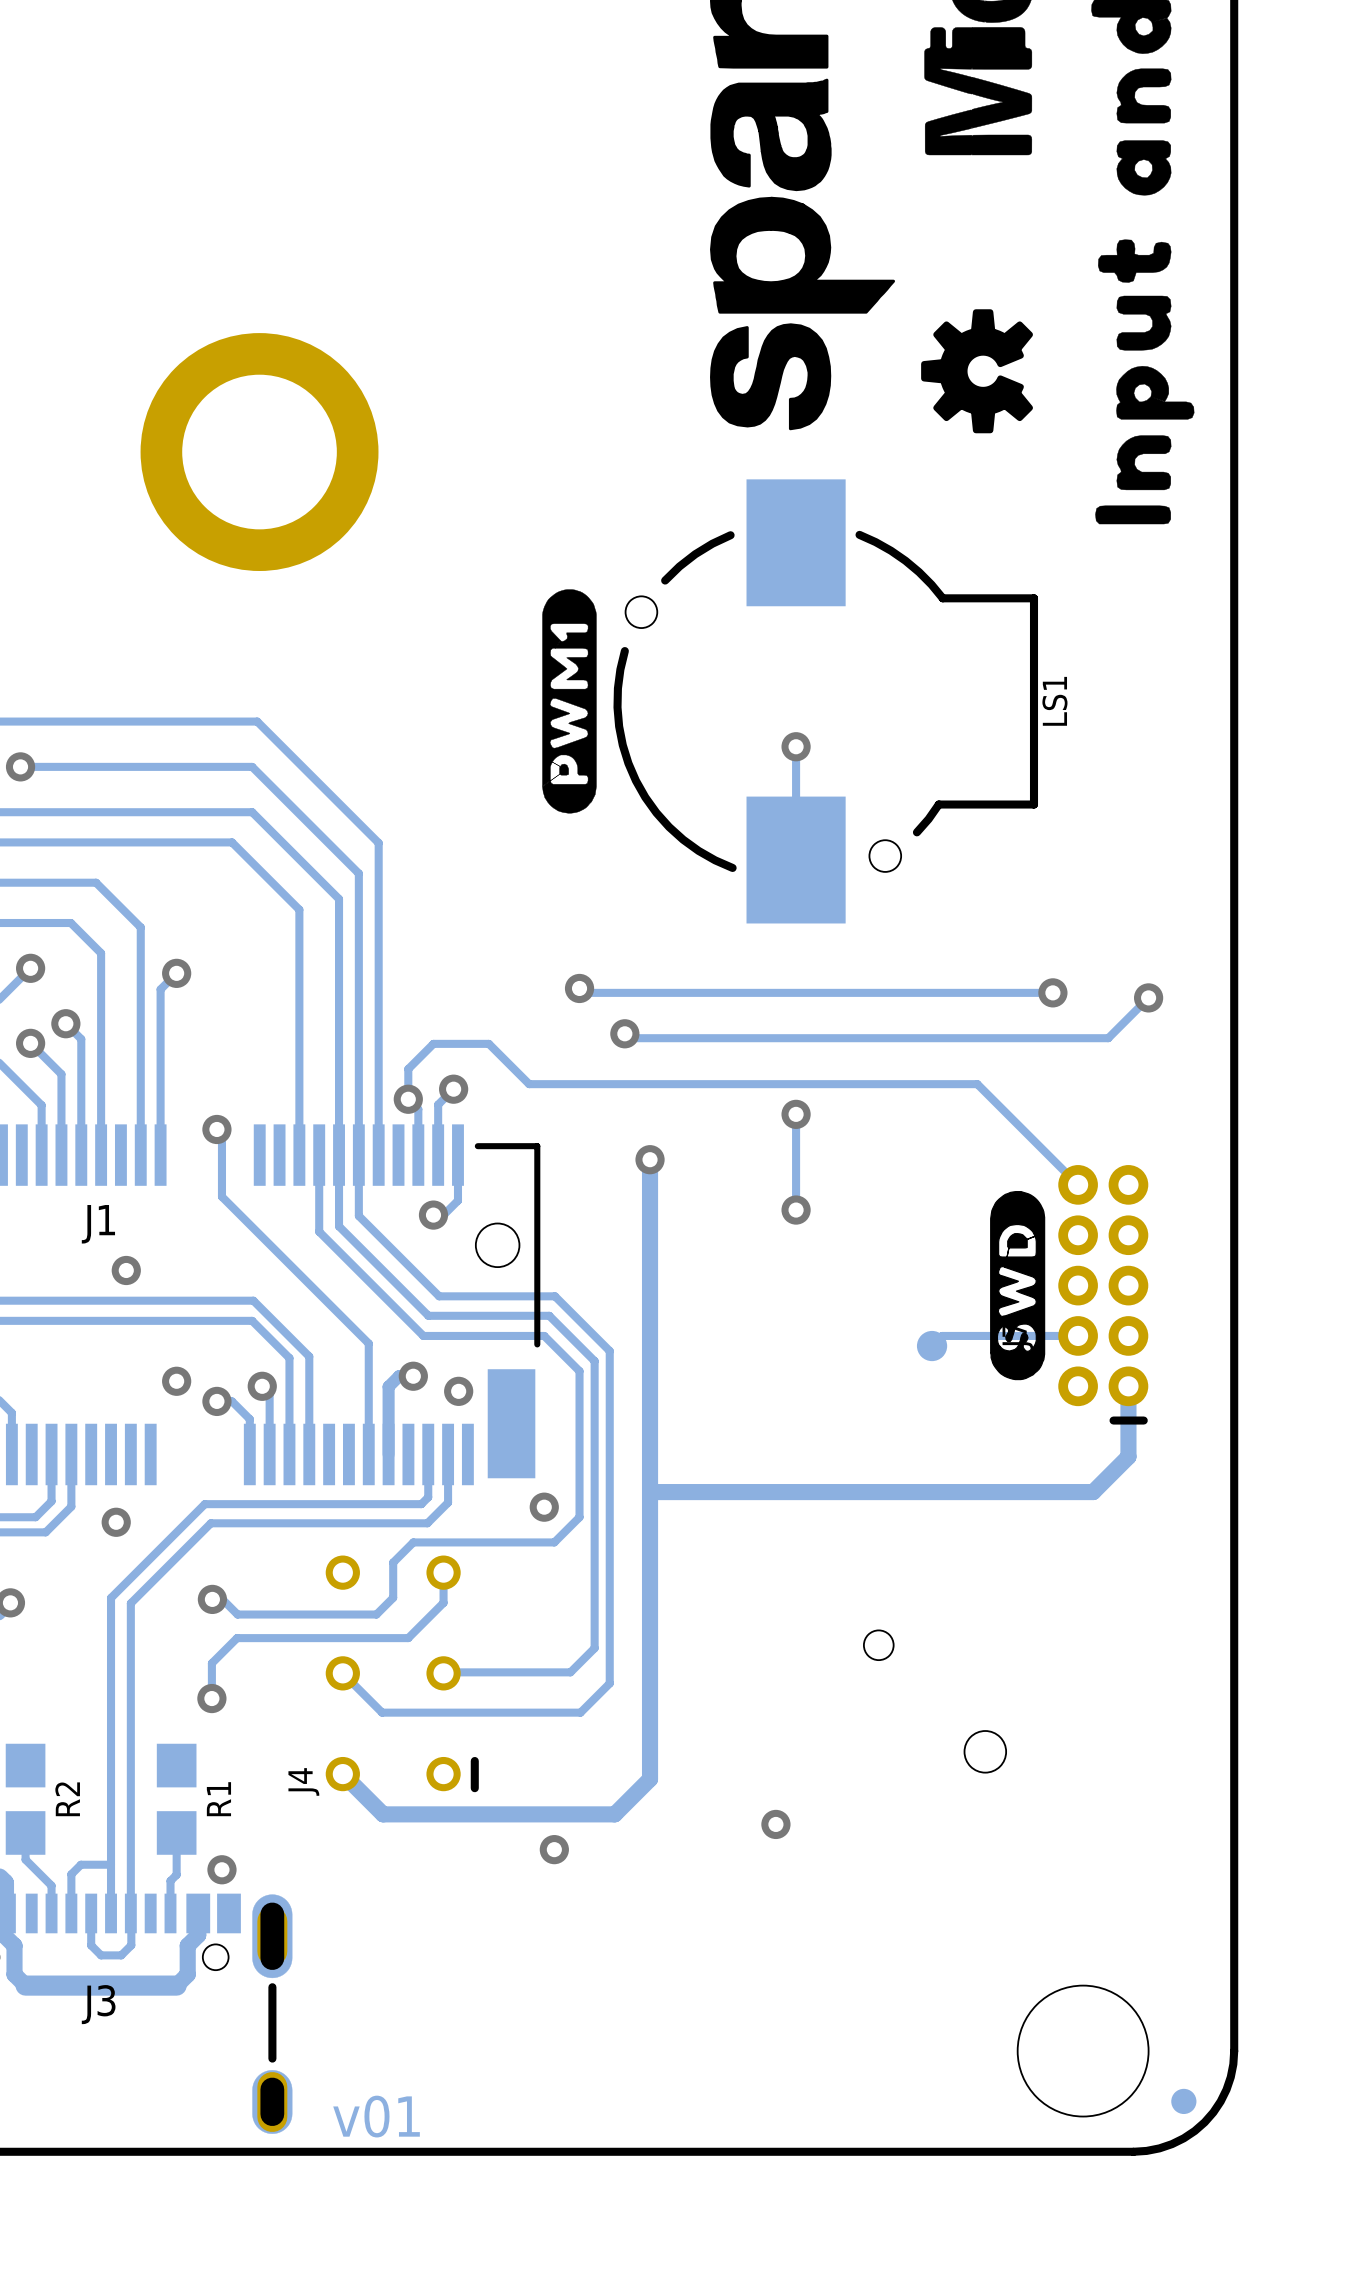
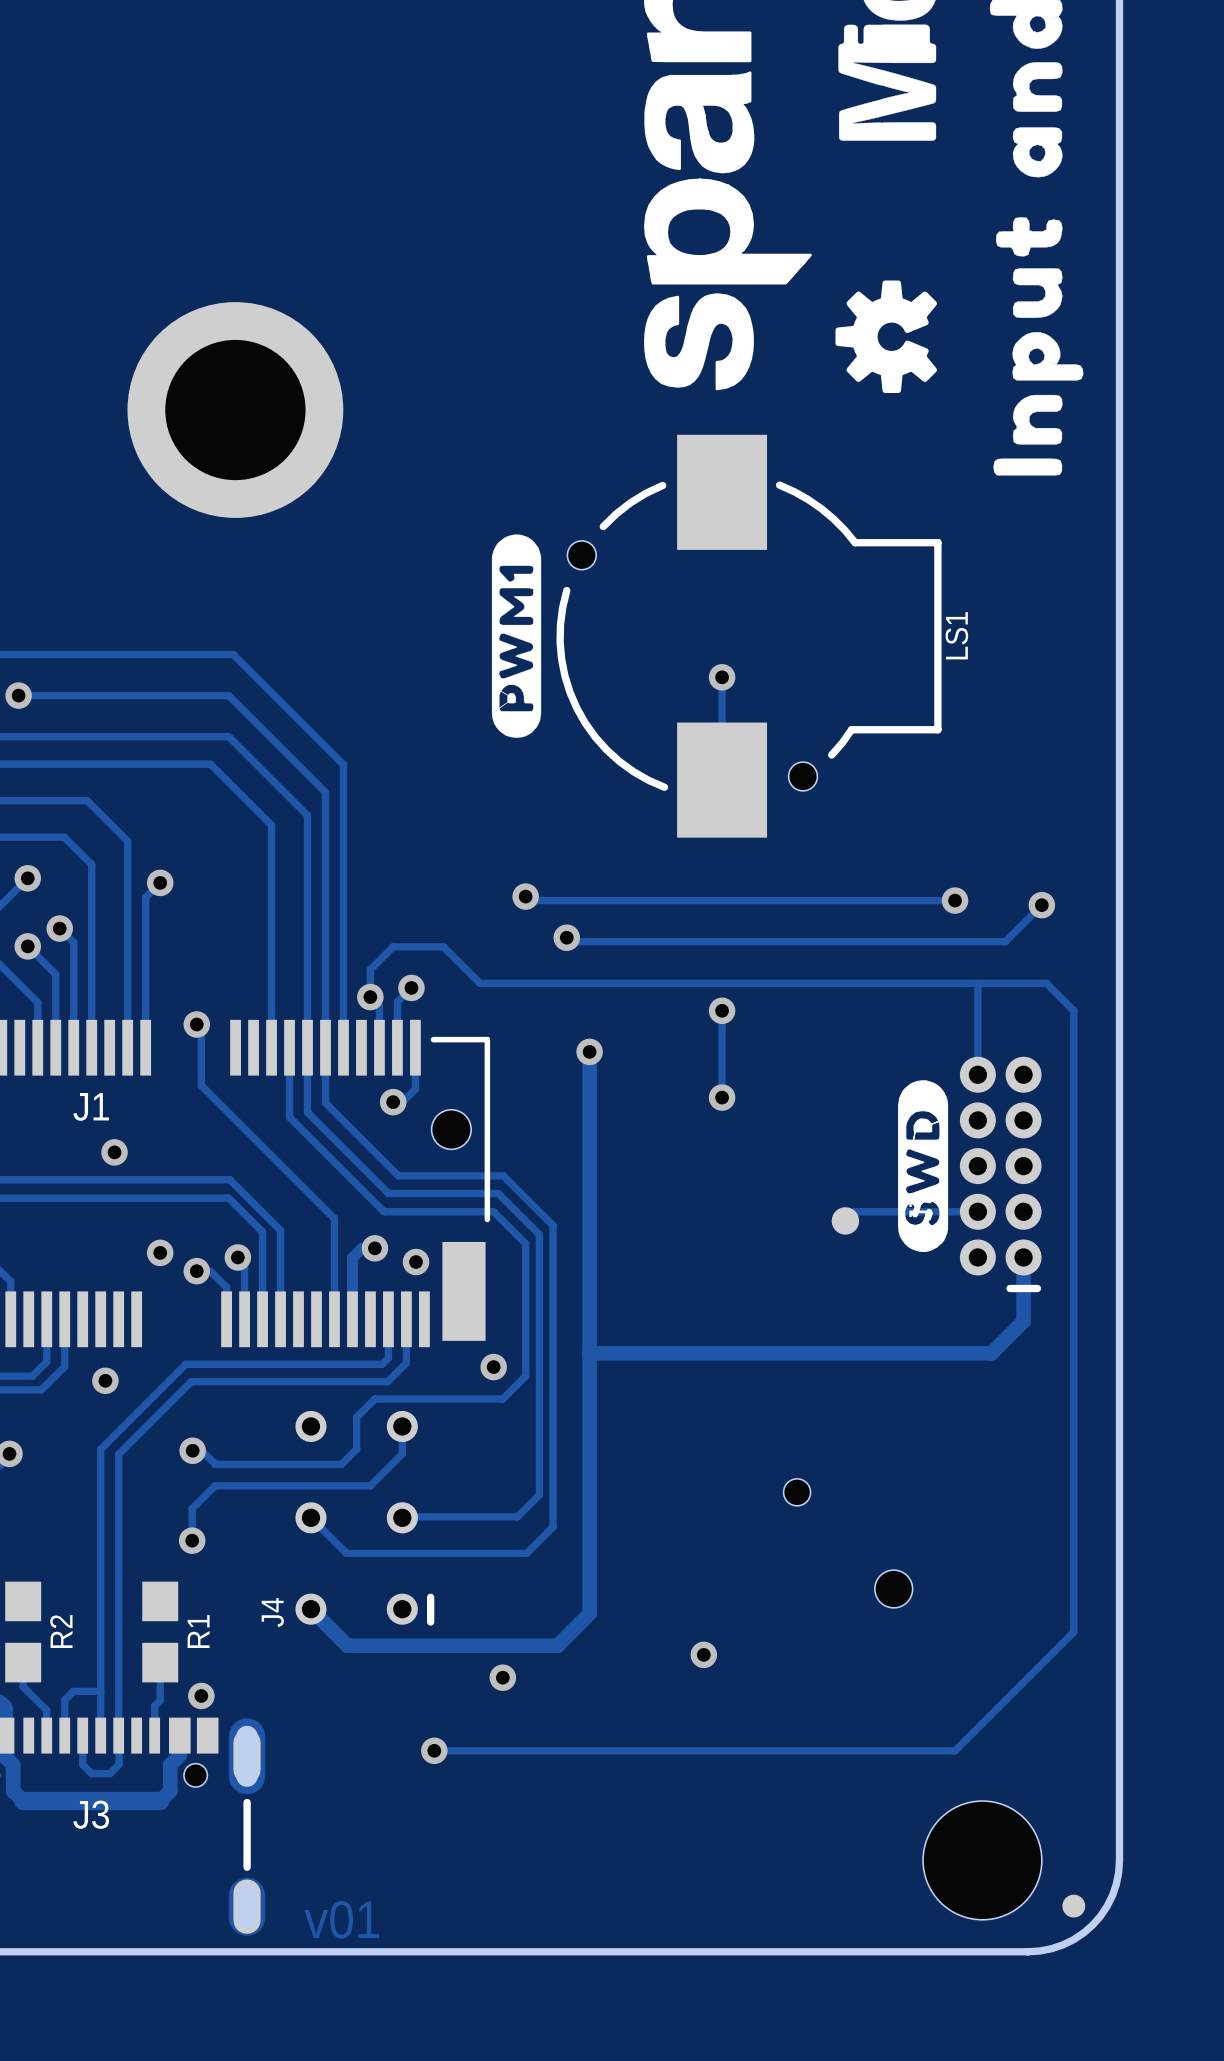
track: (977, 1084) (1078, 1184) -> (977, 983) (977, 1074)
track: none -> (886, 983) (1046, 983) (1073, 1010) (1073, 1632) (955, 1750) (434, 1750)
via: none -> (434, 1750)

